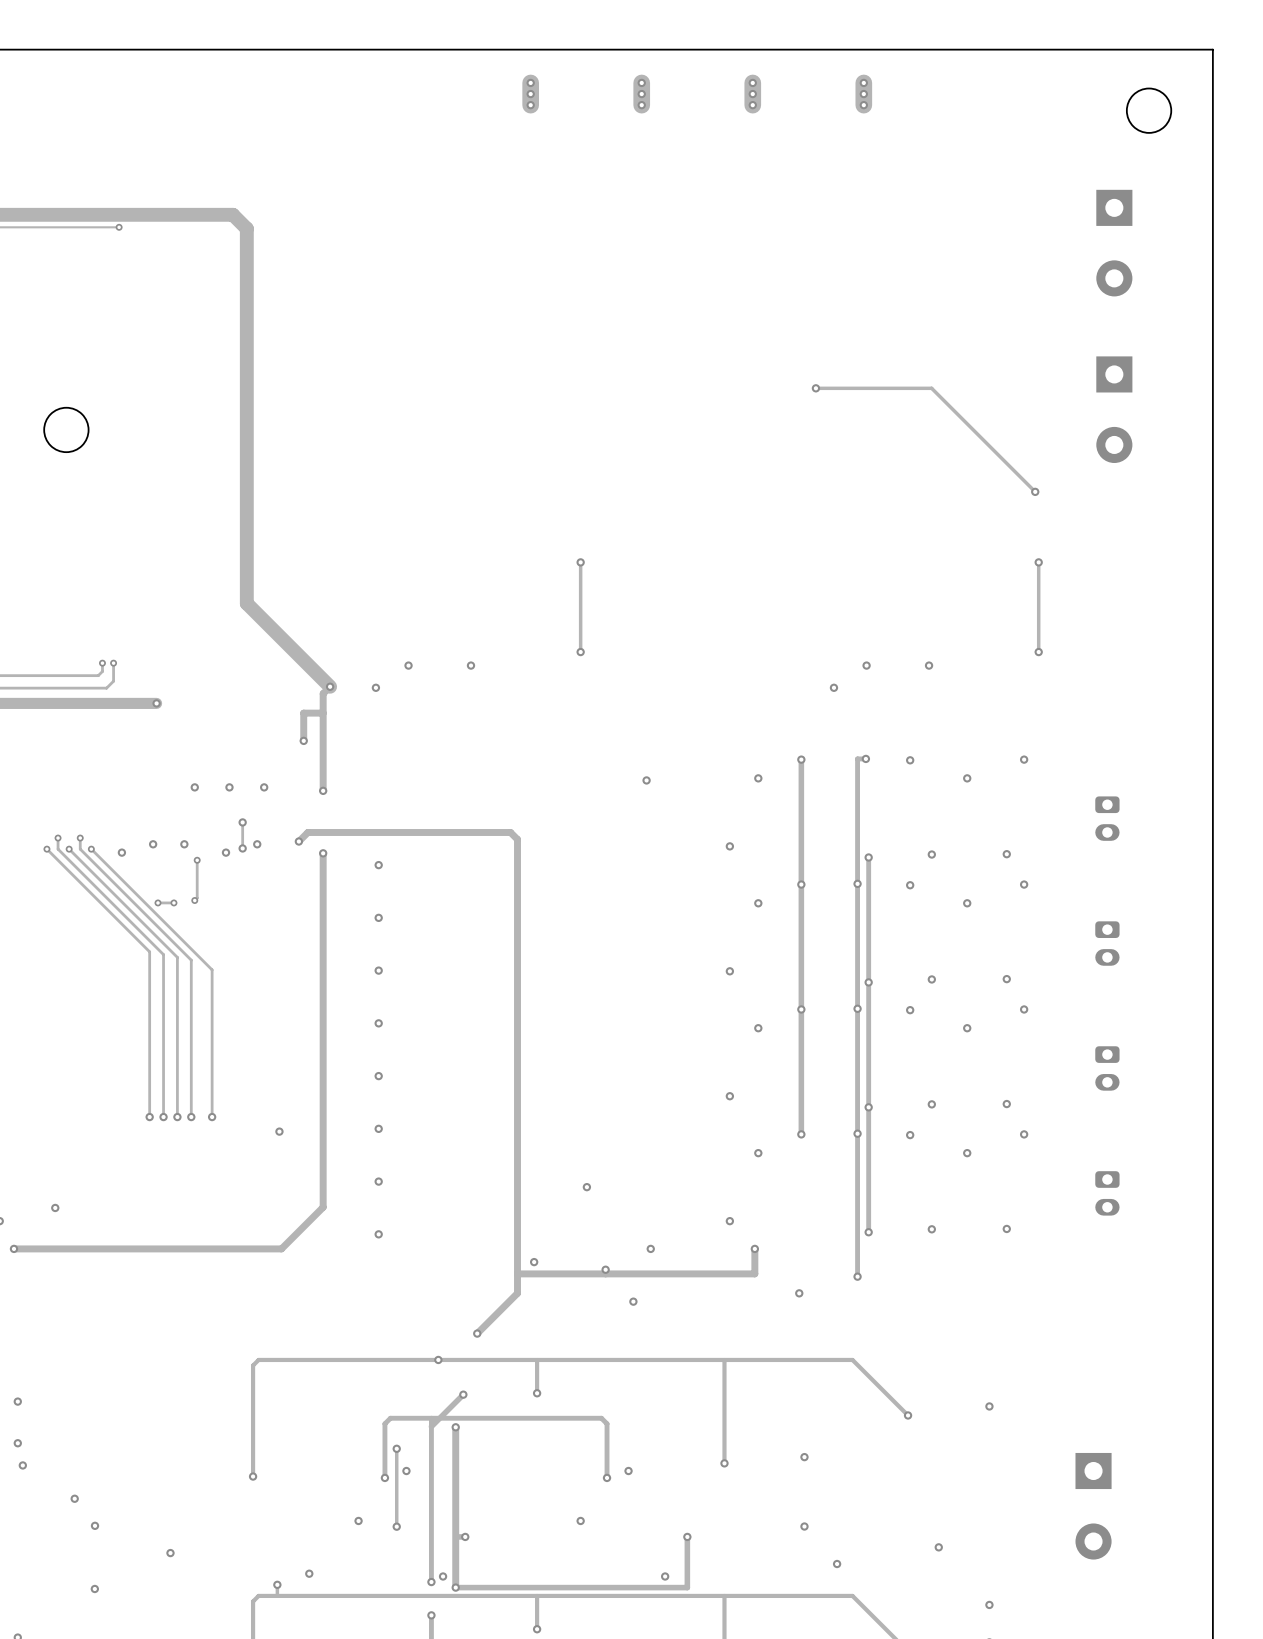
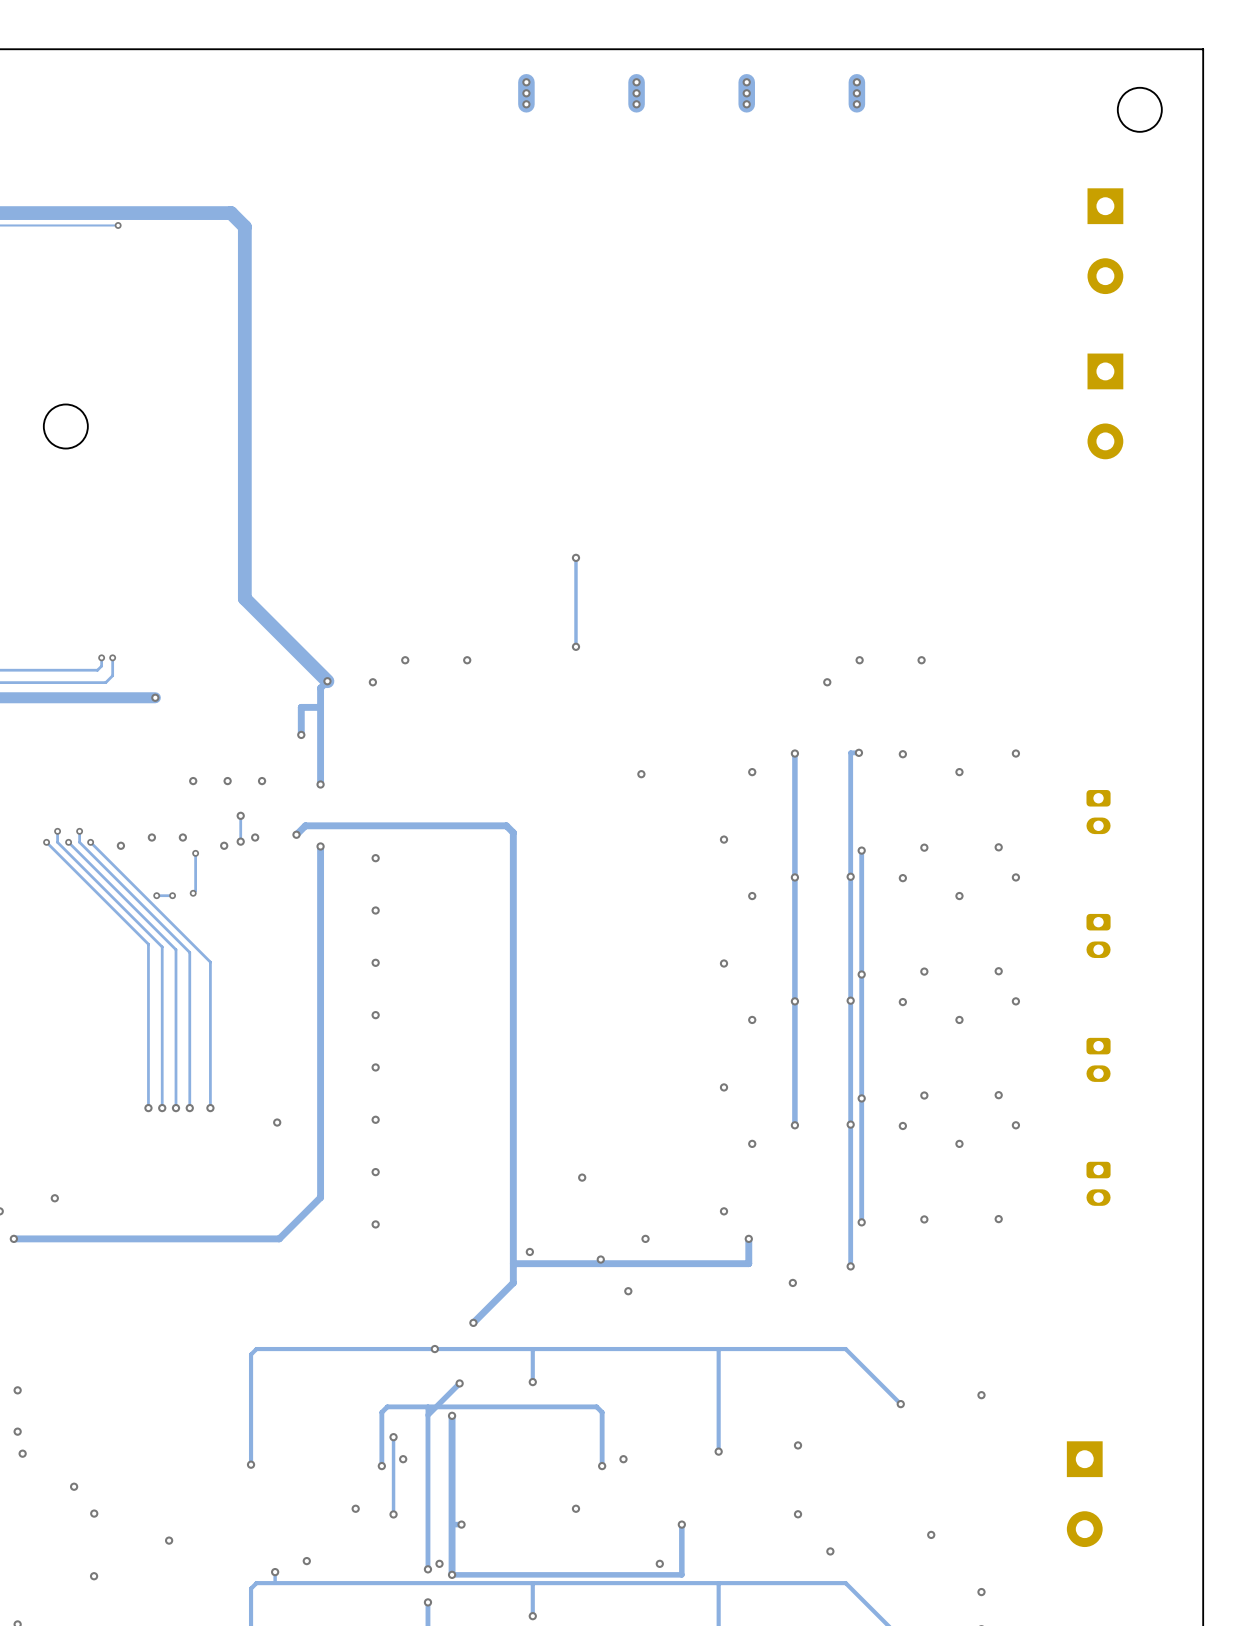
track: (815, 388) (931, 388) (1035, 491) -> none
via: (815, 388) -> none
via: (1035, 491) -> none
track: (1038, 562) (1038, 652) -> none
via: (1038, 562) -> none
via: (1038, 652) -> none

